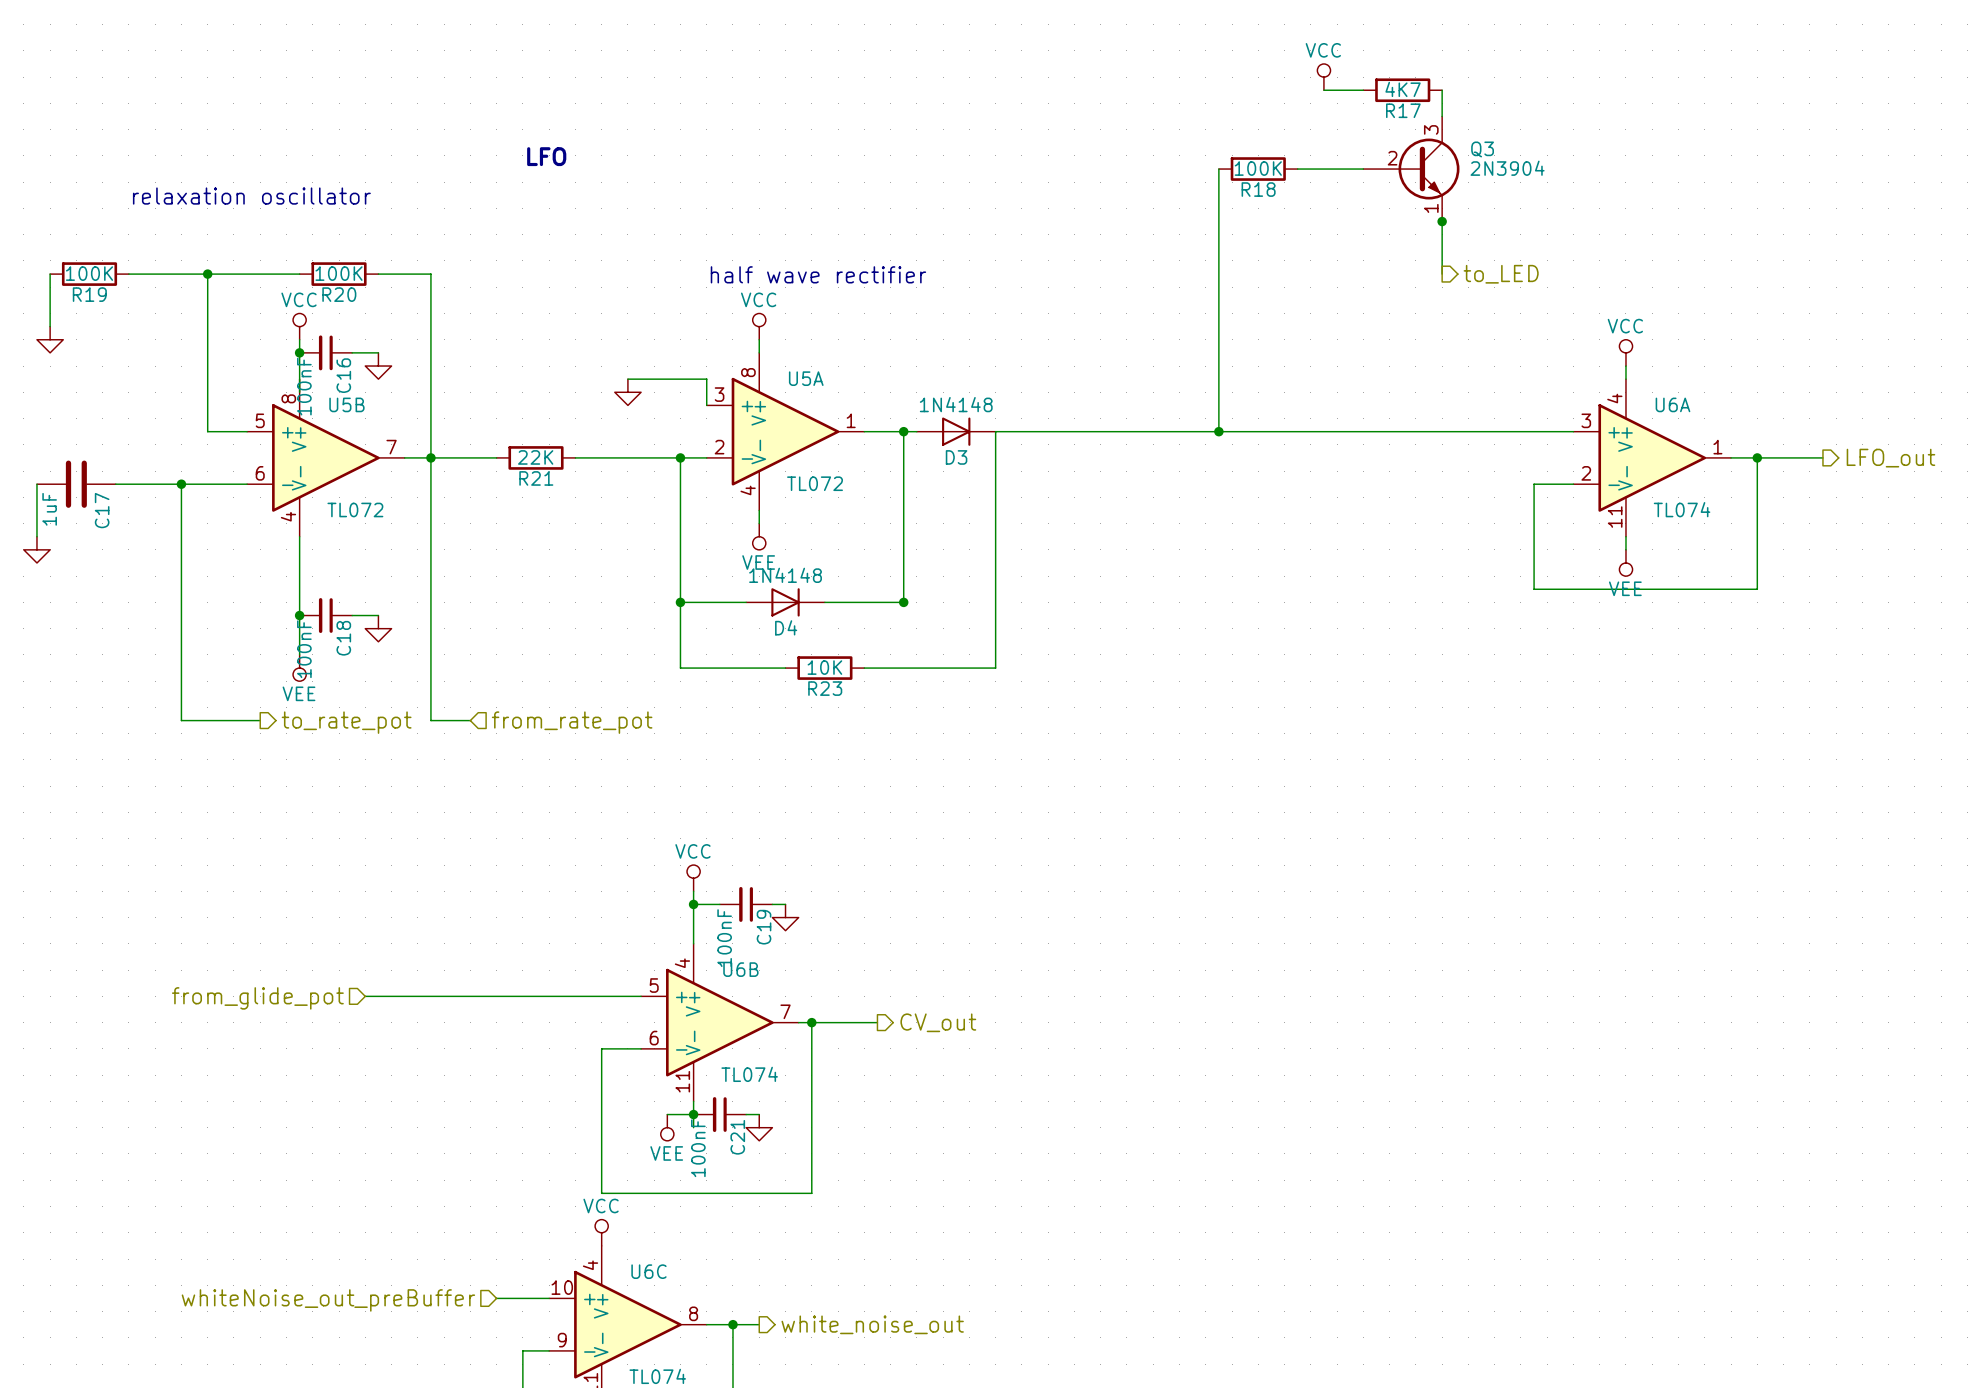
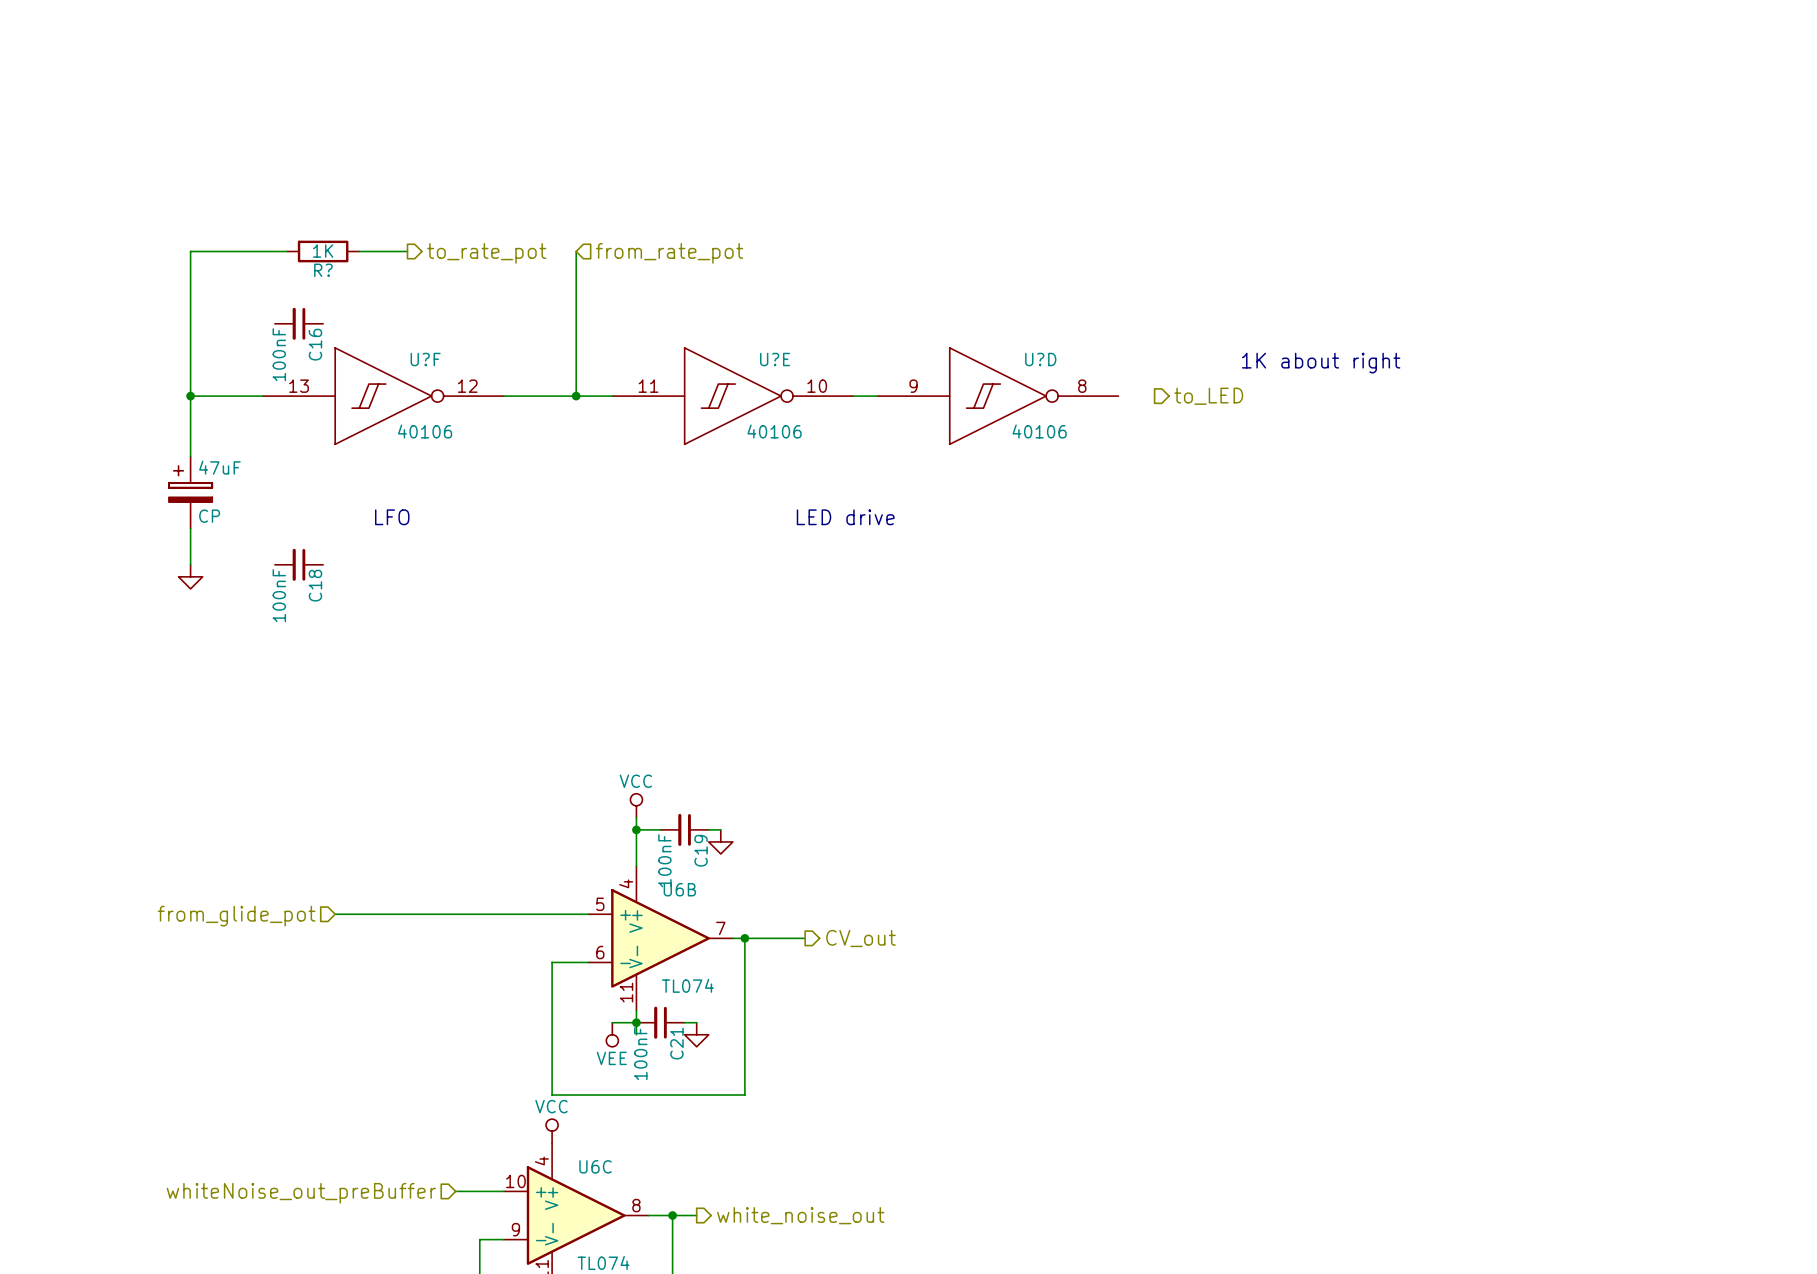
power symbol: VCC (1323, 77) -> none
wire: (1323, 90) (1363, 90) -> none
R17: 4K7 (1402, 90) -> none
wire: (1442, 90) (1442, 116) -> none
text: LFO (546, 156) -> none
wire: (1218, 169) (1218, 431) -> none
R18: 100K (1258, 169) -> none
wire: (1297, 169) (1363, 169) -> none
Q3: 2N3904 (1411, 169) -> none
text: relaxation oscillator (251, 196) -> none
wire: (1442, 221) (1442, 274) -> none
junction: (1442, 221) -> none
wire: (50, 274) (50, 326) -> none
R19: 100K (89, 274) -> none
wire: (128, 274) (207, 274) -> none
junction: (207, 274) -> none
R20: 100K (339, 274) -> none
R?: none -> 1K (323, 251)
wire: (430, 274) (430, 720) (470, 720) -> (395, 251) (407, 251)
wire: none -> (576, 251) (576, 396)
text: half wave rectifier (818, 274) -> none
hierarchical label position: to_LED (1501, 274) -> to_LED (1208, 396)
hierarchical label: none -> to_rate_pot (486, 253)
hierarchical label: none -> from_rate_pot (669, 253)
power symbol: VCC (299, 326) -> none
power symbol: VCC (759, 326) -> none
power symbol: (50, 339) -> none
wire: (299, 339) (299, 392) -> none
wire: (759, 339) (759, 352) -> none
junction: (299, 352) -> none
wire: (352, 352) (378, 352) -> none
power symbol: VCC (1625, 352) -> none
power symbol: (378, 366) -> none
wire: (1625, 366) (1625, 379) -> none
wire: (627, 379) (706, 379) (706, 405) -> none
power symbol: (627, 392) -> none
text: none -> 1K about right (1321, 363)
wire: none -> (190, 396) (190, 456)
U?F: none -> 40106 (383, 396)
wire: none -> (503, 396) (612, 396)
U5A: TL072 (785, 431) -> none
U?E: none -> 40106 (732, 396)
wire: (903, 431) (903, 602) (824, 602) -> none
junction: (903, 431) -> none
D3: 1N4148 (956, 431) -> none
U?D: none -> 40106 (997, 396)
junction: (1218, 431) -> none
wire: (1573, 431) (995, 431) (995, 668) (864, 668) -> none
U5B: TL072 (325, 457) -> none
wire: (404, 457) (496, 457) -> none
junction: (430, 457) -> none
R21: 22K (536, 457) -> none
wire: (575, 457) (706, 457) -> none
wire: (680, 457) (680, 668) (785, 668) -> none
junction position: (680, 457) -> (576, 396)
U6A: TL074 (1652, 457) -> none
wire: (1731, 457) (1822, 457) -> none
wire: (1757, 457) (1757, 589) (1534, 589) (1534, 484) (1573, 484) -> none
junction: (1757, 457) -> none
hierarchical label: LFO_out (1890, 458) -> none
wire: (36, 484) (36, 536) -> none
C17: 1uF (76, 484) -> none
wire: (115, 484) (247, 484) -> none
wire: (181, 484) (181, 720) (260, 720) -> none
junction position: (181, 484) -> (190, 396)
wire: (759, 510) (759, 523) -> none
47uF: none -> CP (190, 492)
wire: (299, 536) (299, 654) -> none
power symbol: VEE (759, 536) -> none
wire: (1625, 536) (1625, 549) -> none
power symbol: (36, 549) -> none
text: none -> LFO (392, 517)
text: none -> LED drive (845, 517)
power symbol: VEE (1625, 563) -> none
wire: none -> (190, 528) (190, 564)
wire: (680, 602) (746, 602) -> none
junction: (680, 602) -> none
D4: 1N4148 (785, 602) -> none
junction: (903, 602) -> none
junction: (299, 615) -> none
wire: (352, 615) (378, 615) -> none
power symbol: none -> (190, 576)
power symbol: (378, 628) -> none
power symbol: VEE (299, 668) -> none
R23: 10K (824, 668) -> none
hierarchical label: to_rate_pot (346, 722) -> none
hierarchical label: from_rate_pot (572, 722) -> none

